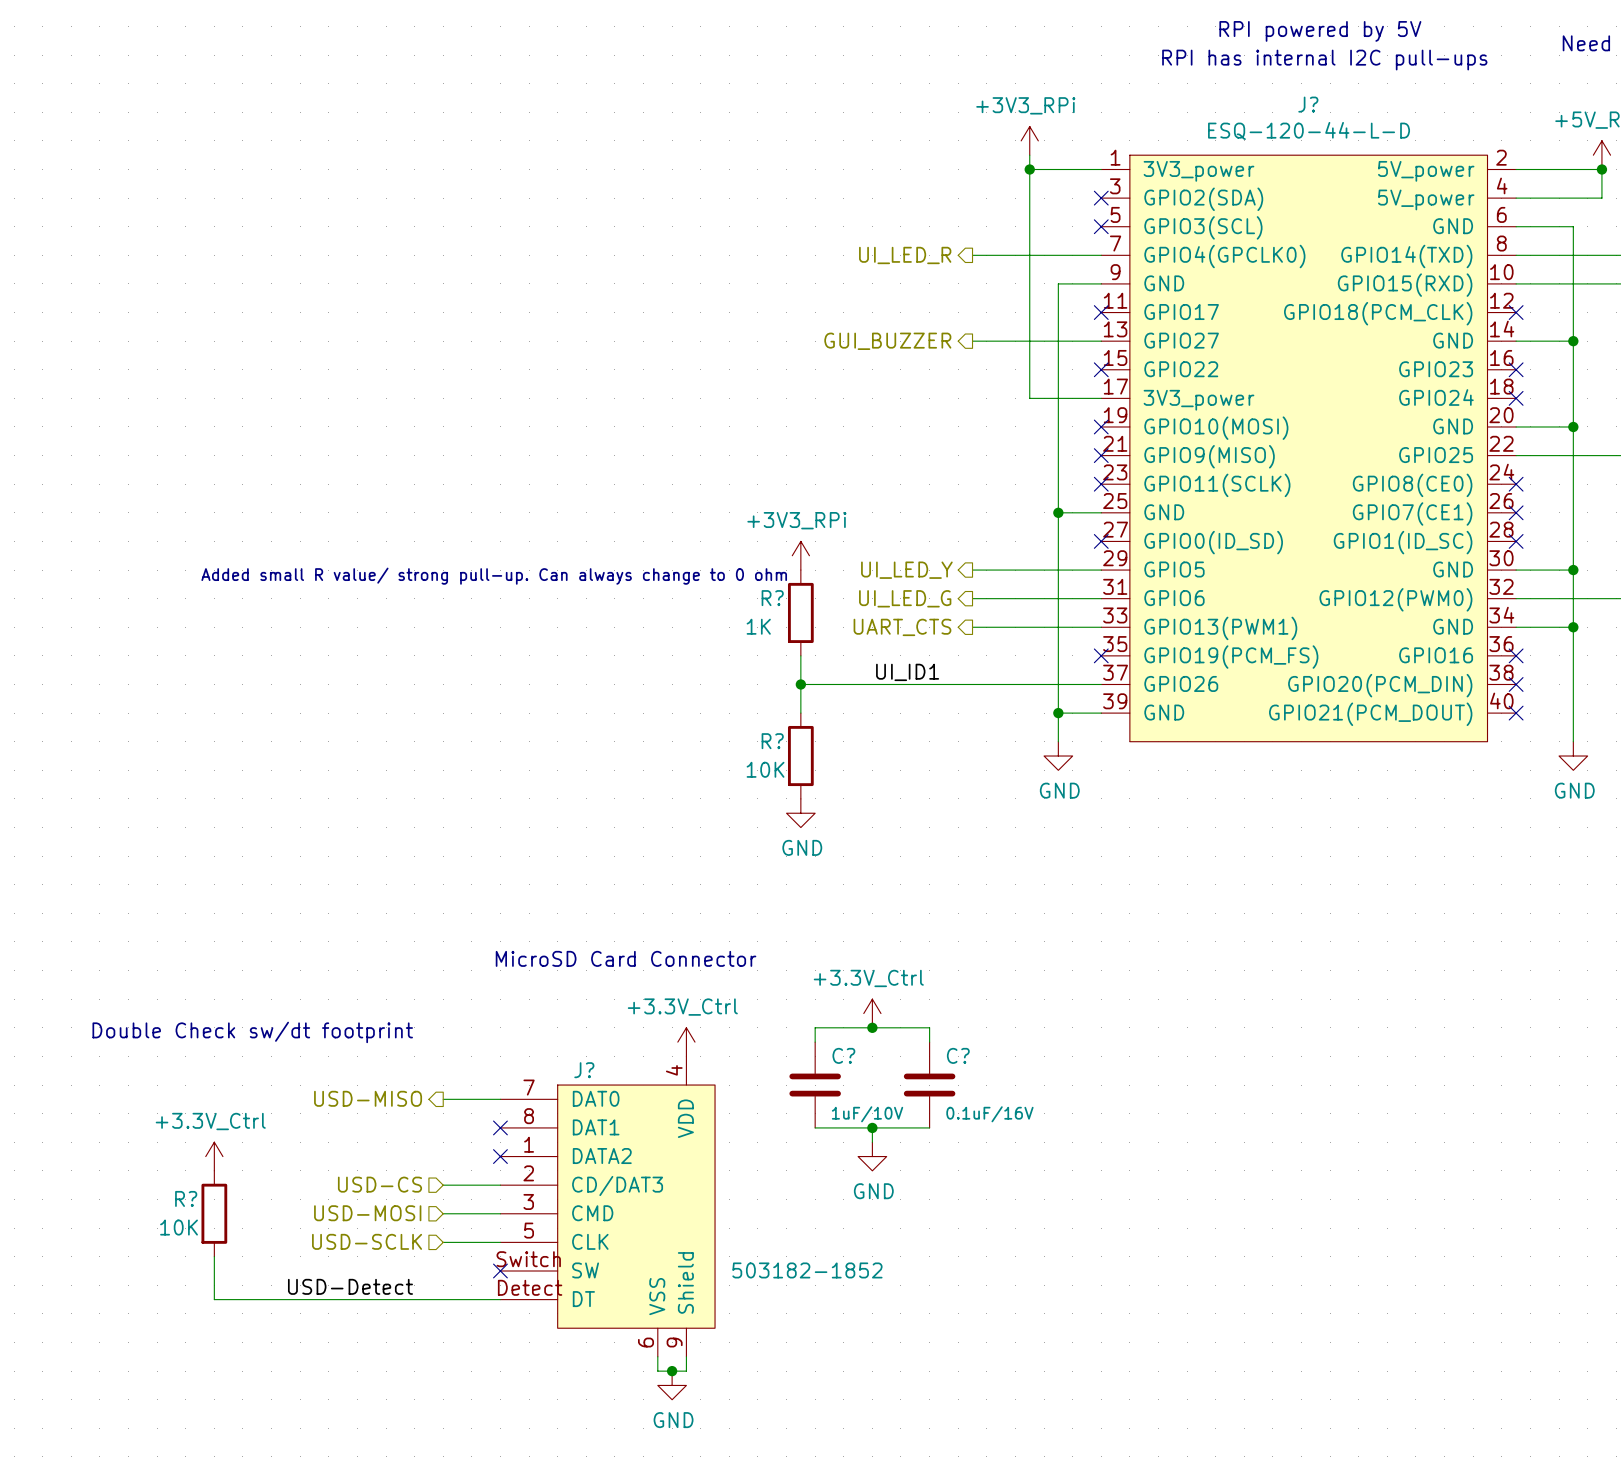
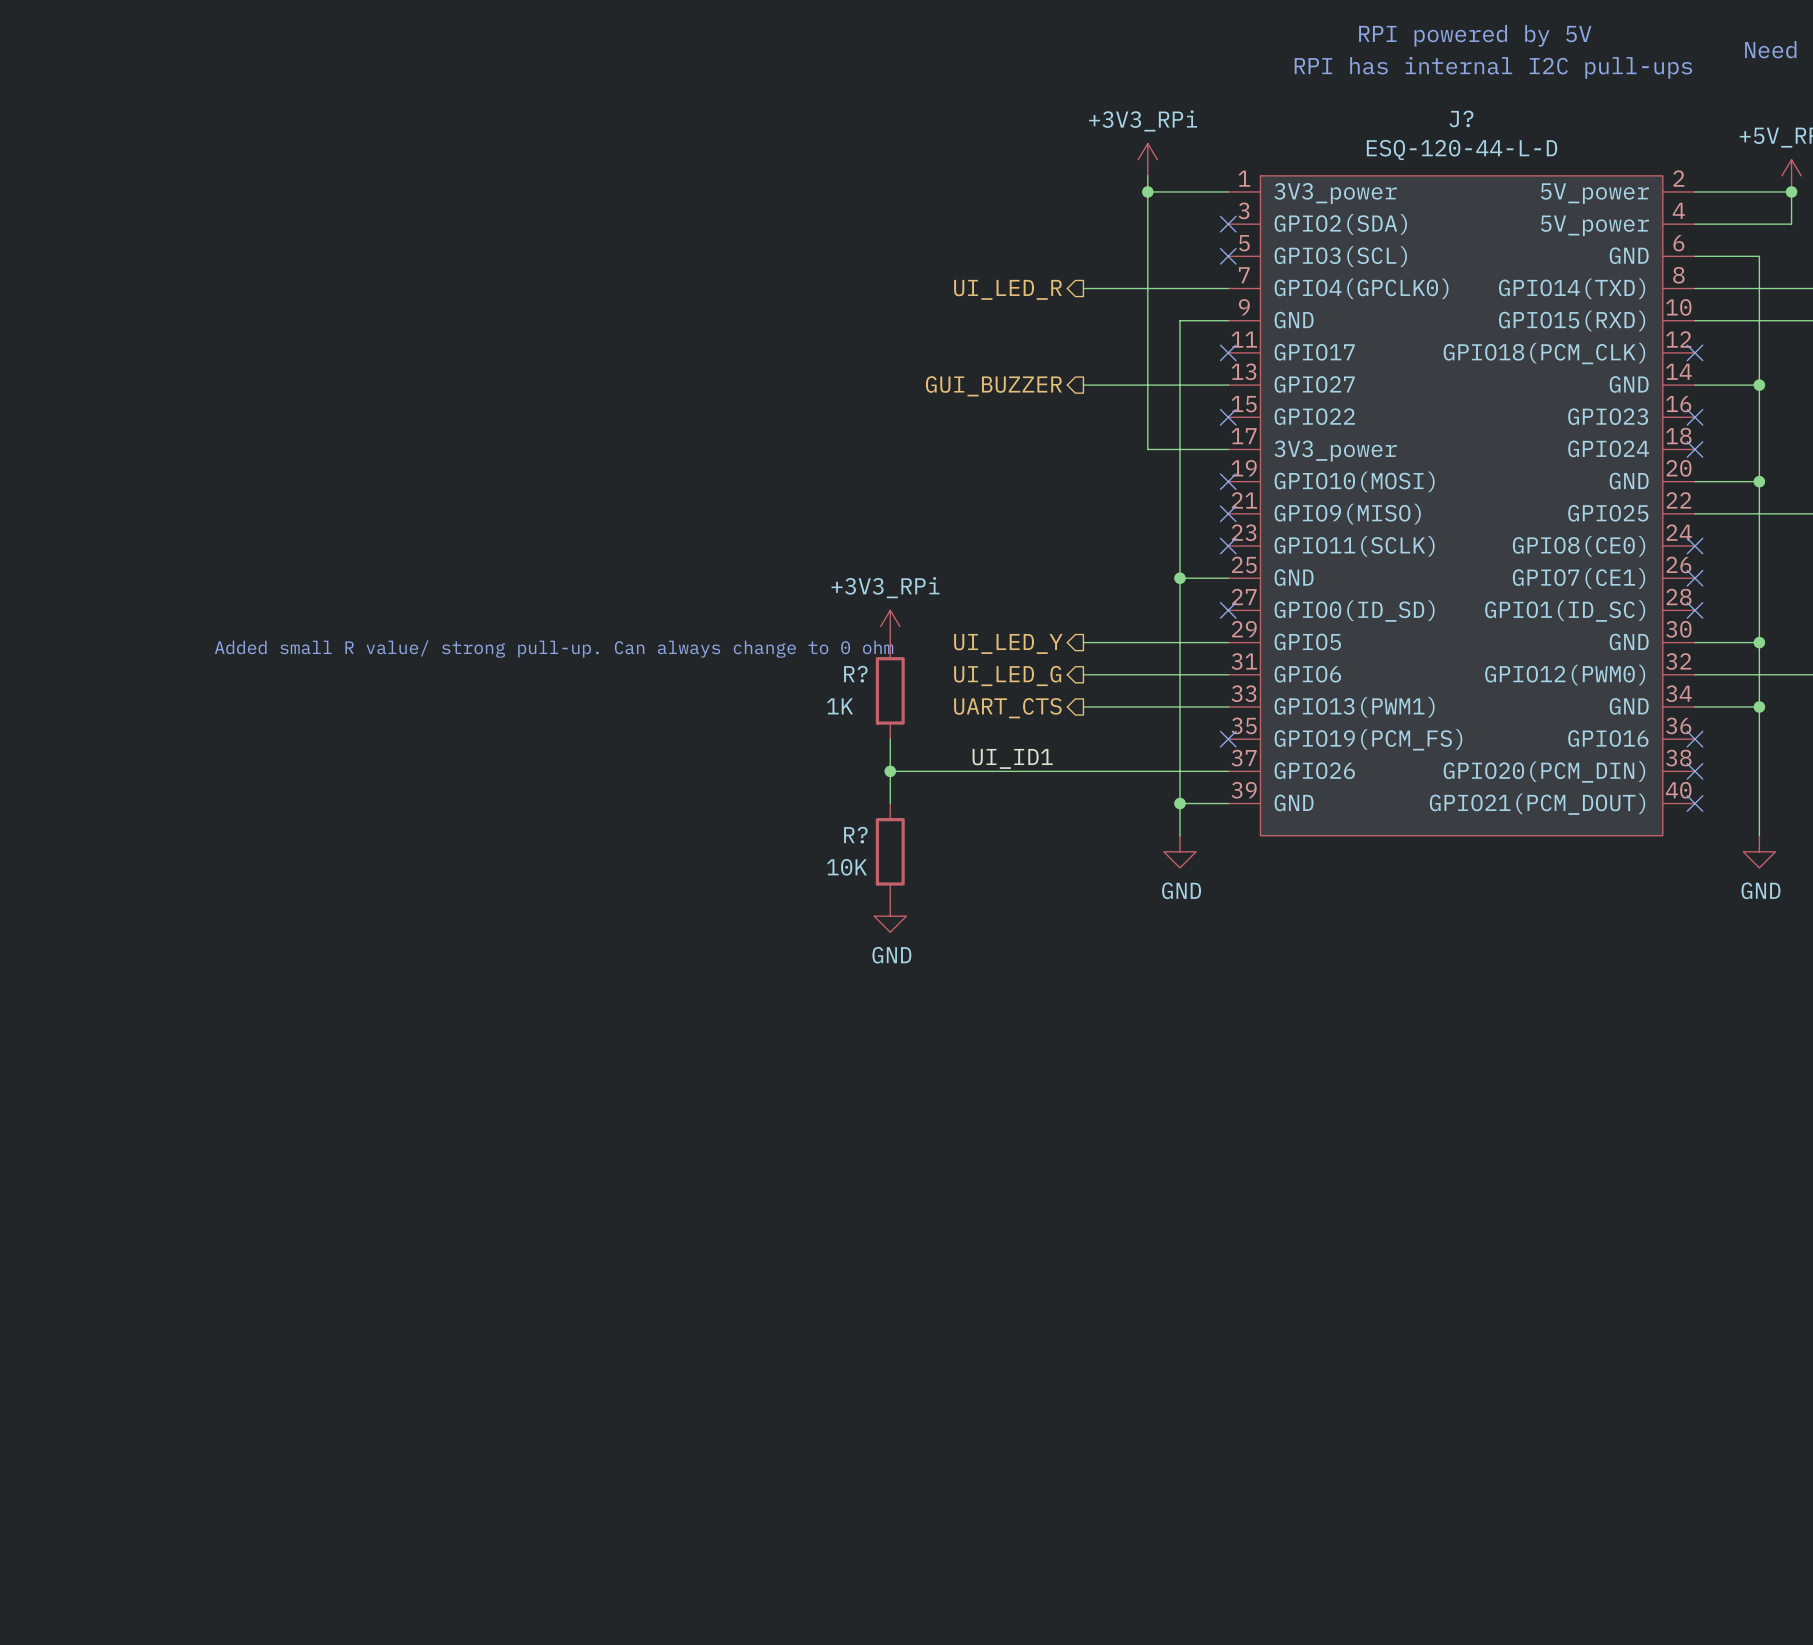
text: MicroSD Card Connector (626, 958) -> none
power symbol: +3.3V_Ctrl (872, 1013) -> none
junction: (872, 1027) -> none
text: Double Check sw/dt footprint (252, 1032) -> none
power symbol: +3.3V_Ctrl (686, 1042) -> none
wire: (815, 1042) (815, 1027) (929, 1027) (929, 1042) -> none
C?: 1uF/10V (815, 1085) -> none
C?: 0.1uF/16V (929, 1085) -> none
hierarchical label: USD-MISO (368, 1098) -> none
wire: (443, 1099) (500, 1099) -> none
no-connect mark: (500, 1127) -> none
wire: (815, 1127) (929, 1127) -> none
wire: (872, 1127) (872, 1142) -> none
junction: (872, 1127) -> none
power symbol: +3.3V_Ctrl (214, 1156) -> none
no-connect mark: (500, 1156) -> none
power symbol: GND (872, 1156) -> none
hierarchical label: USD-CS (379, 1184) -> none
wire: (443, 1185) (500, 1185) -> none
J?: 503182-1852 (607, 1206) -> none
R?: 10K (214, 1213) -> none
hierarchical label: USD-MOSI (367, 1213) -> none
wire: (443, 1213) (500, 1213) -> none
hierarchical label: USD-SCLK (367, 1241) -> none
wire: (443, 1242) (500, 1242) -> none
wire: (214, 1256) (214, 1299) (500, 1299) -> none
no-connect mark: (500, 1271) -> none
label: USD-Detect (350, 1286) -> none
wire: (657, 1356) (657, 1371) (686, 1371) (686, 1356) -> none
junction: (672, 1371) -> none
power symbol: GND (672, 1385) -> none

